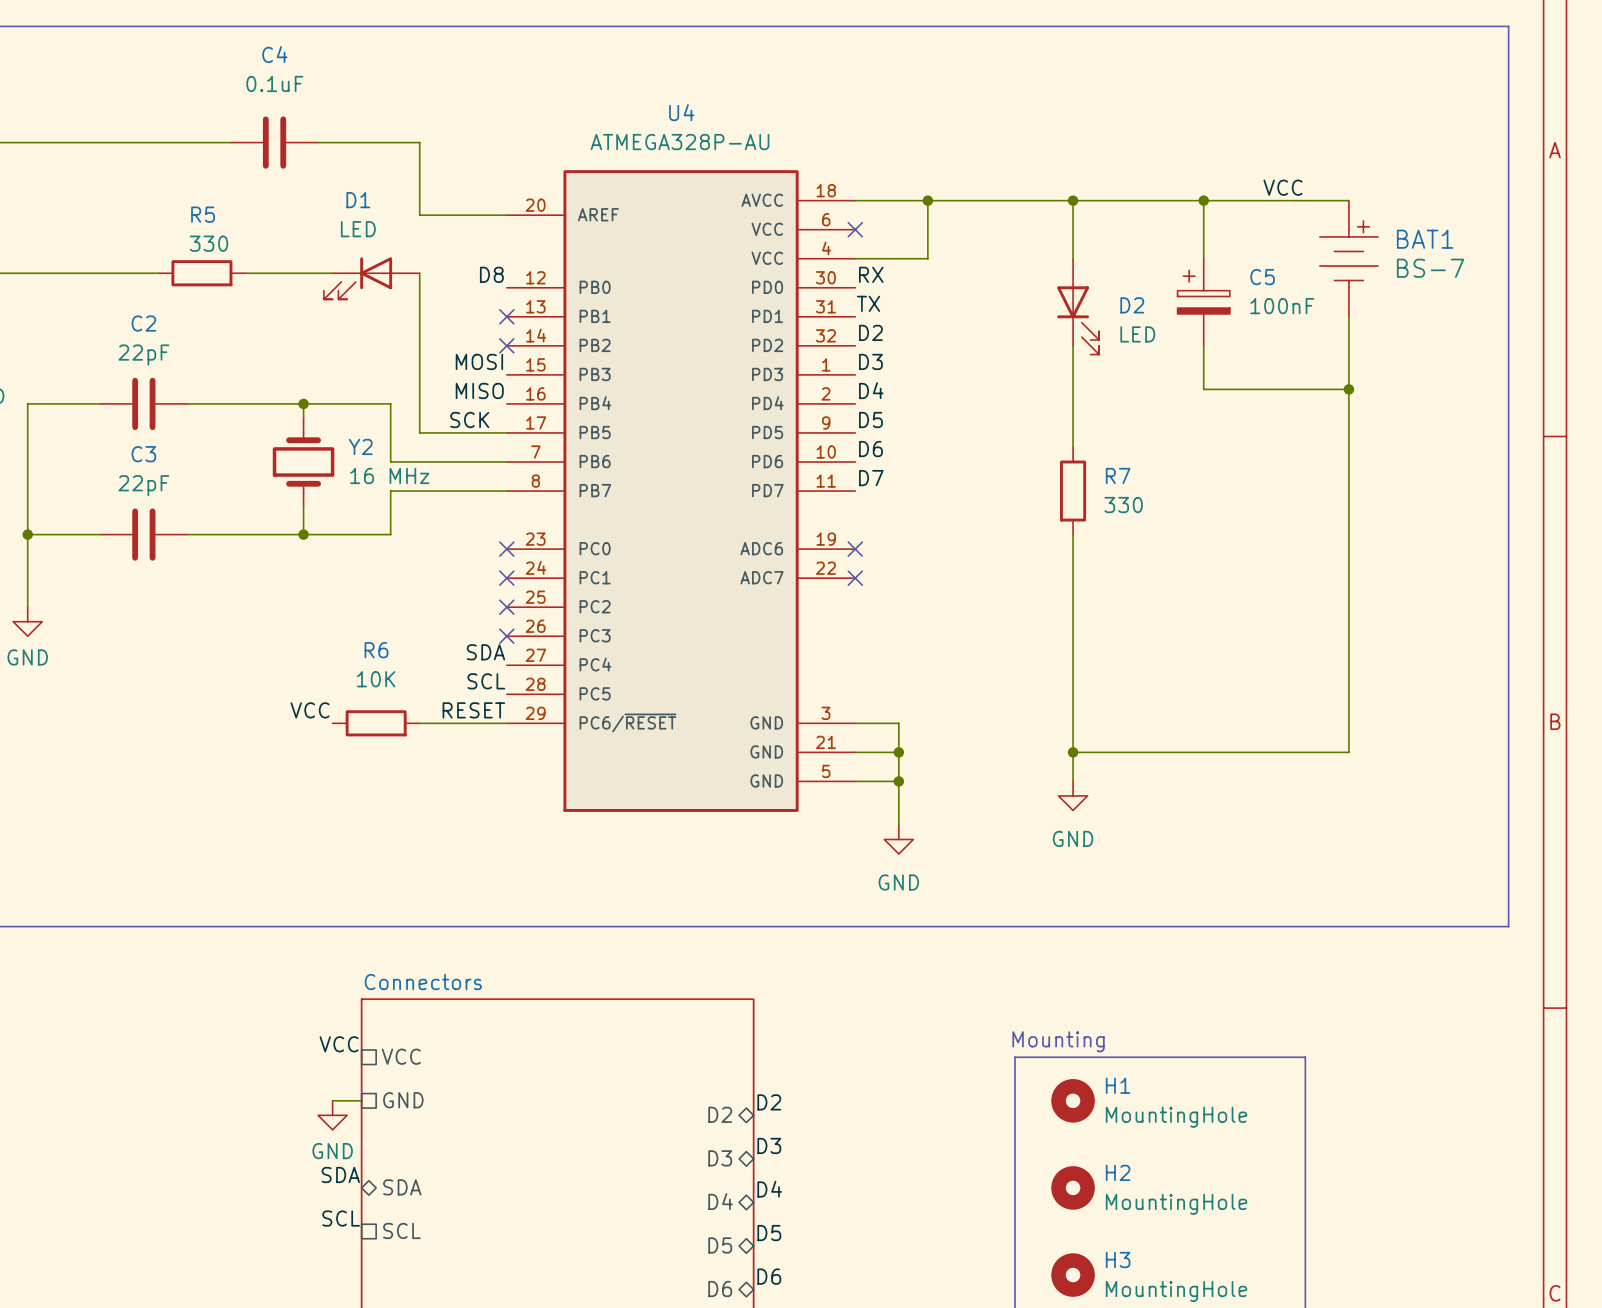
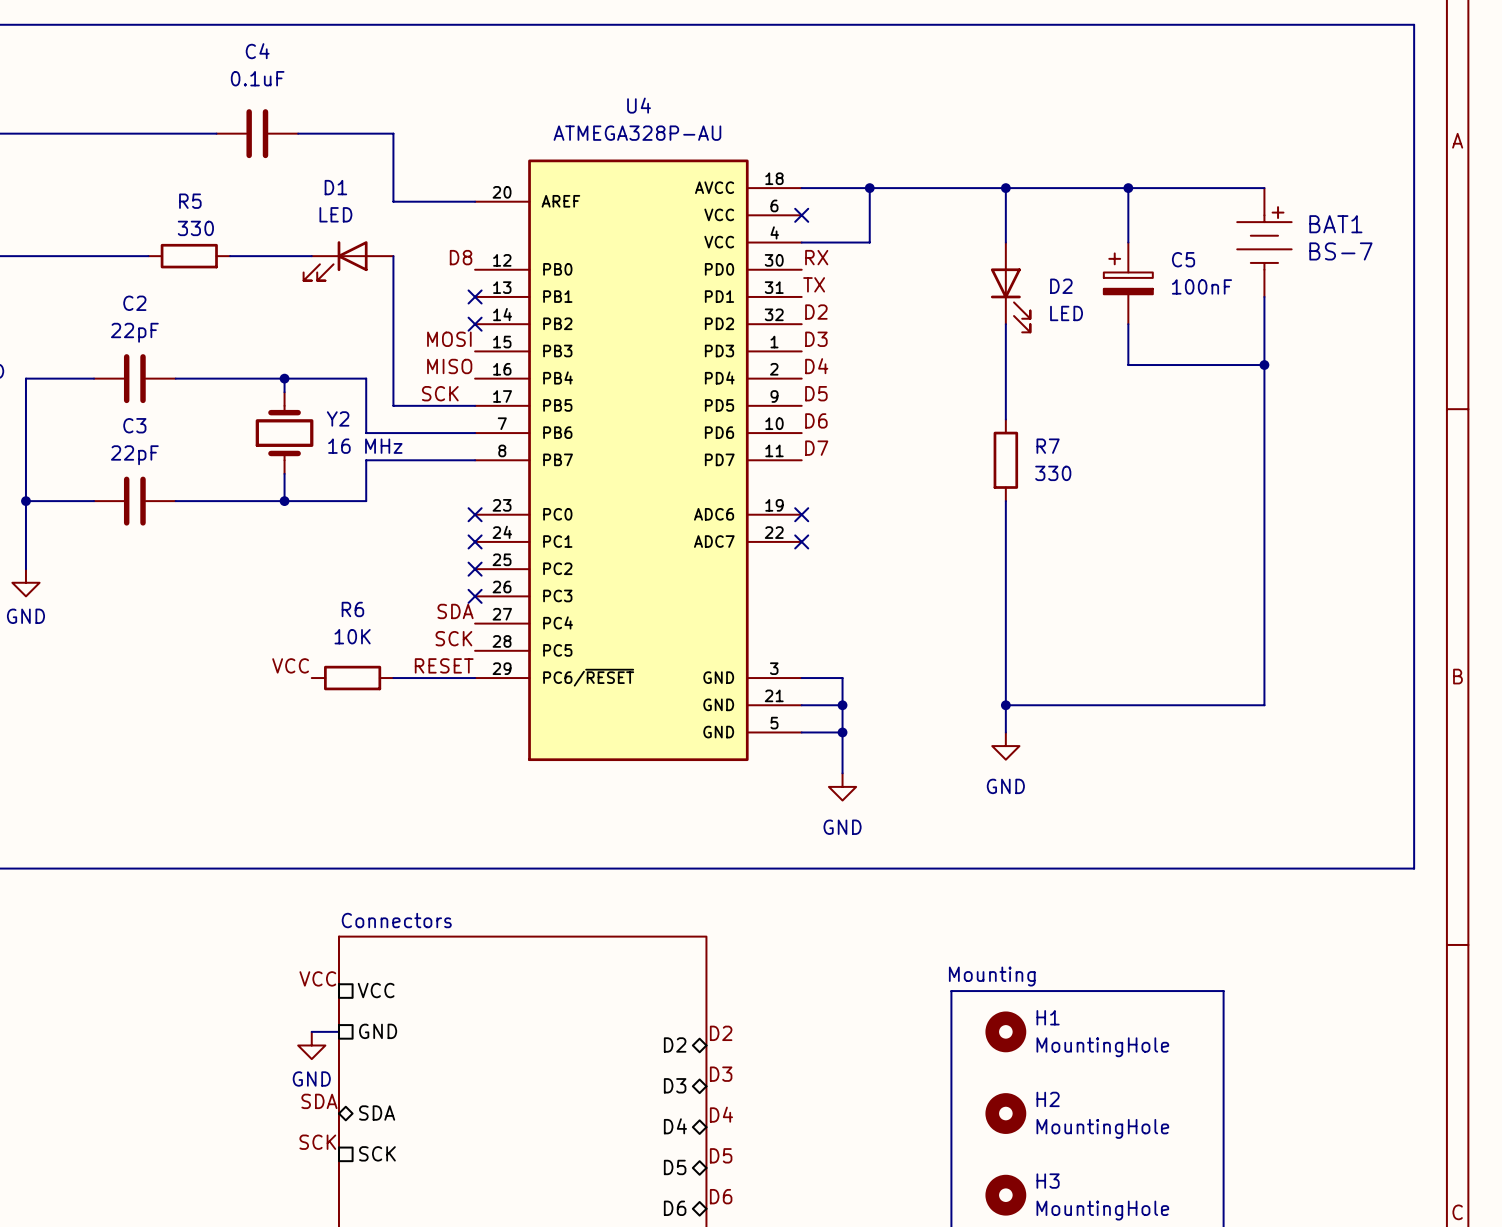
label: VCC (1282, 187) -> none
label: SCL (486, 681) -> SCK (453, 638)
label: SCL (341, 1218) -> SCK (317, 1142)
sheet pin: SCL (401, 1230) -> SCK (377, 1153)

